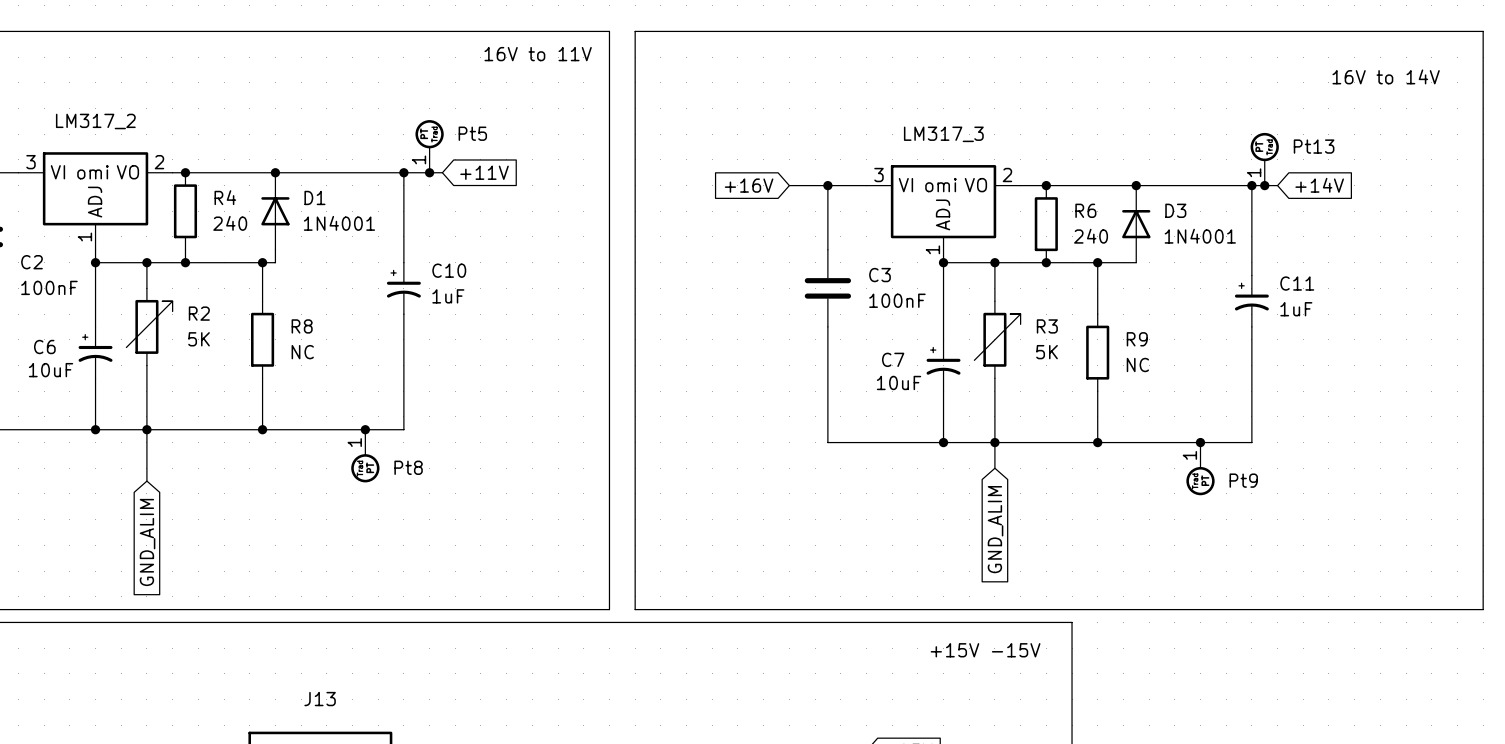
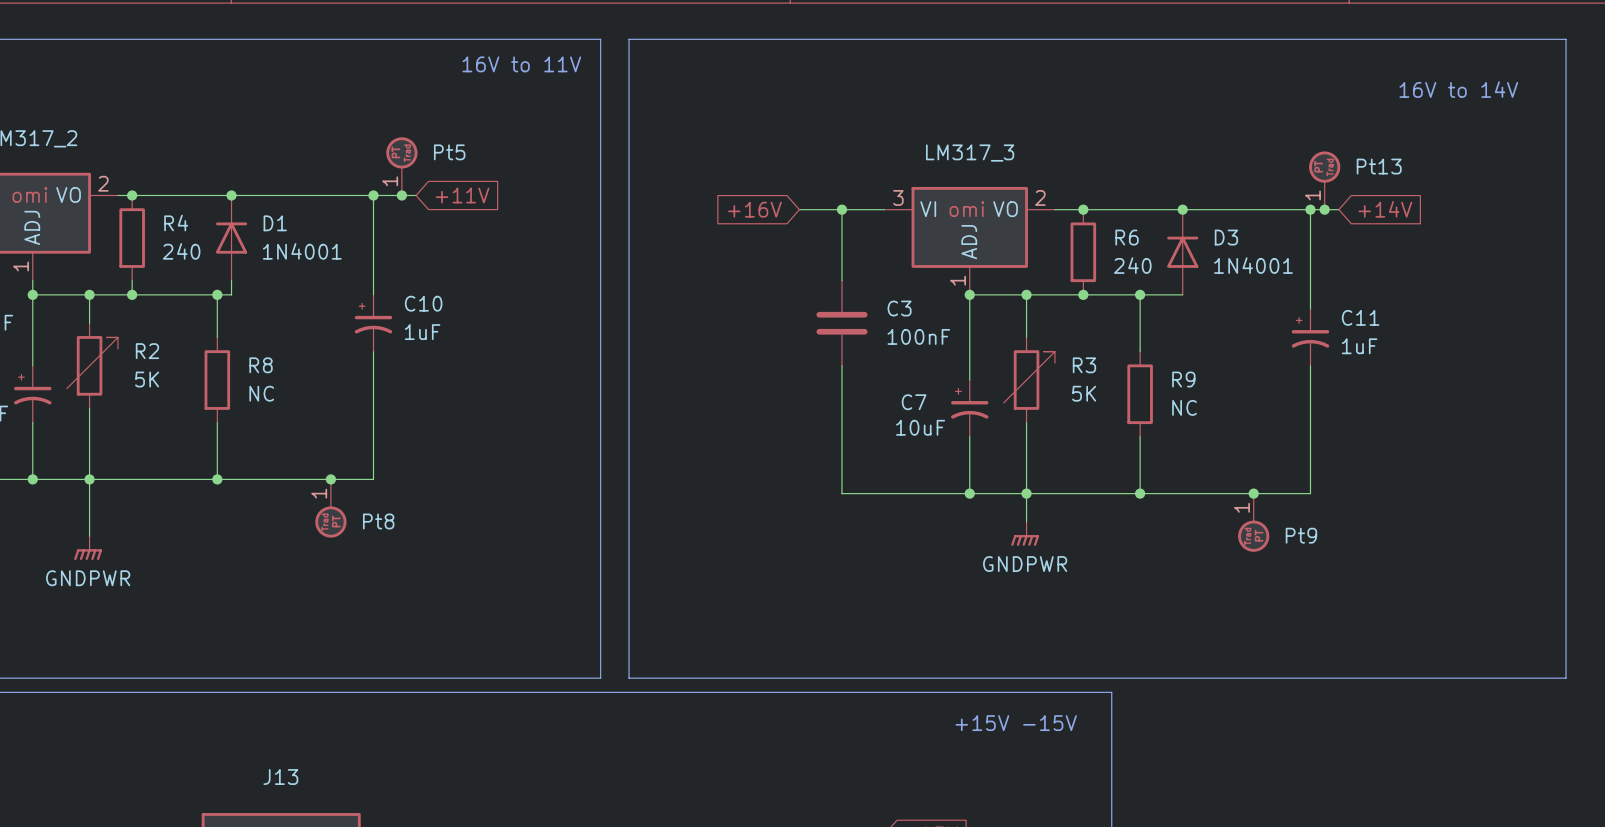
power symbol: none -> GNDPWR (1025, 533)
power symbol: none -> GNDPWR (88, 548)
global label: GND_ALIM (995, 529) -> none
global label: GND_ALIM (147, 542) -> none

